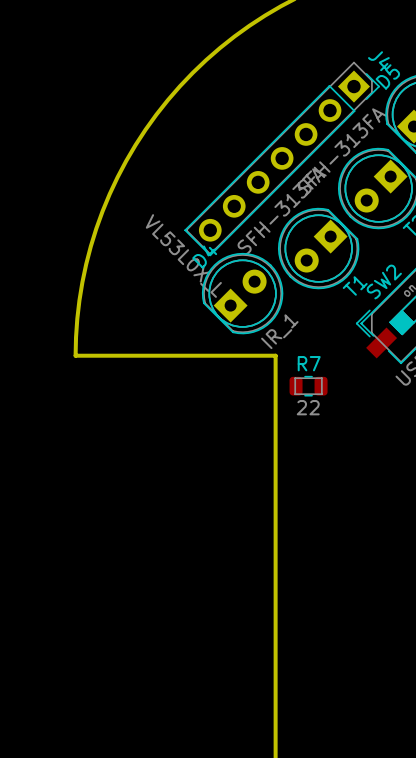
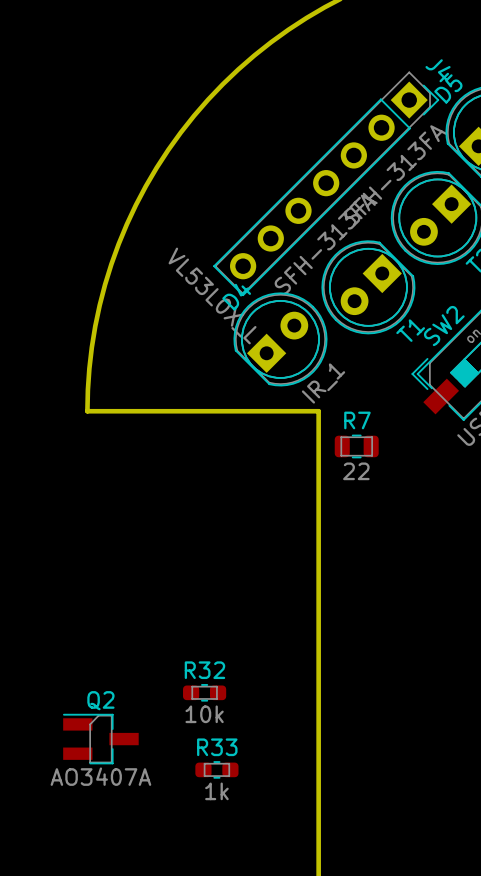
R32: none -> 10k (204, 692)
Q2: none -> AO3407A (100, 739)
R33: none -> 1k (216, 769)

